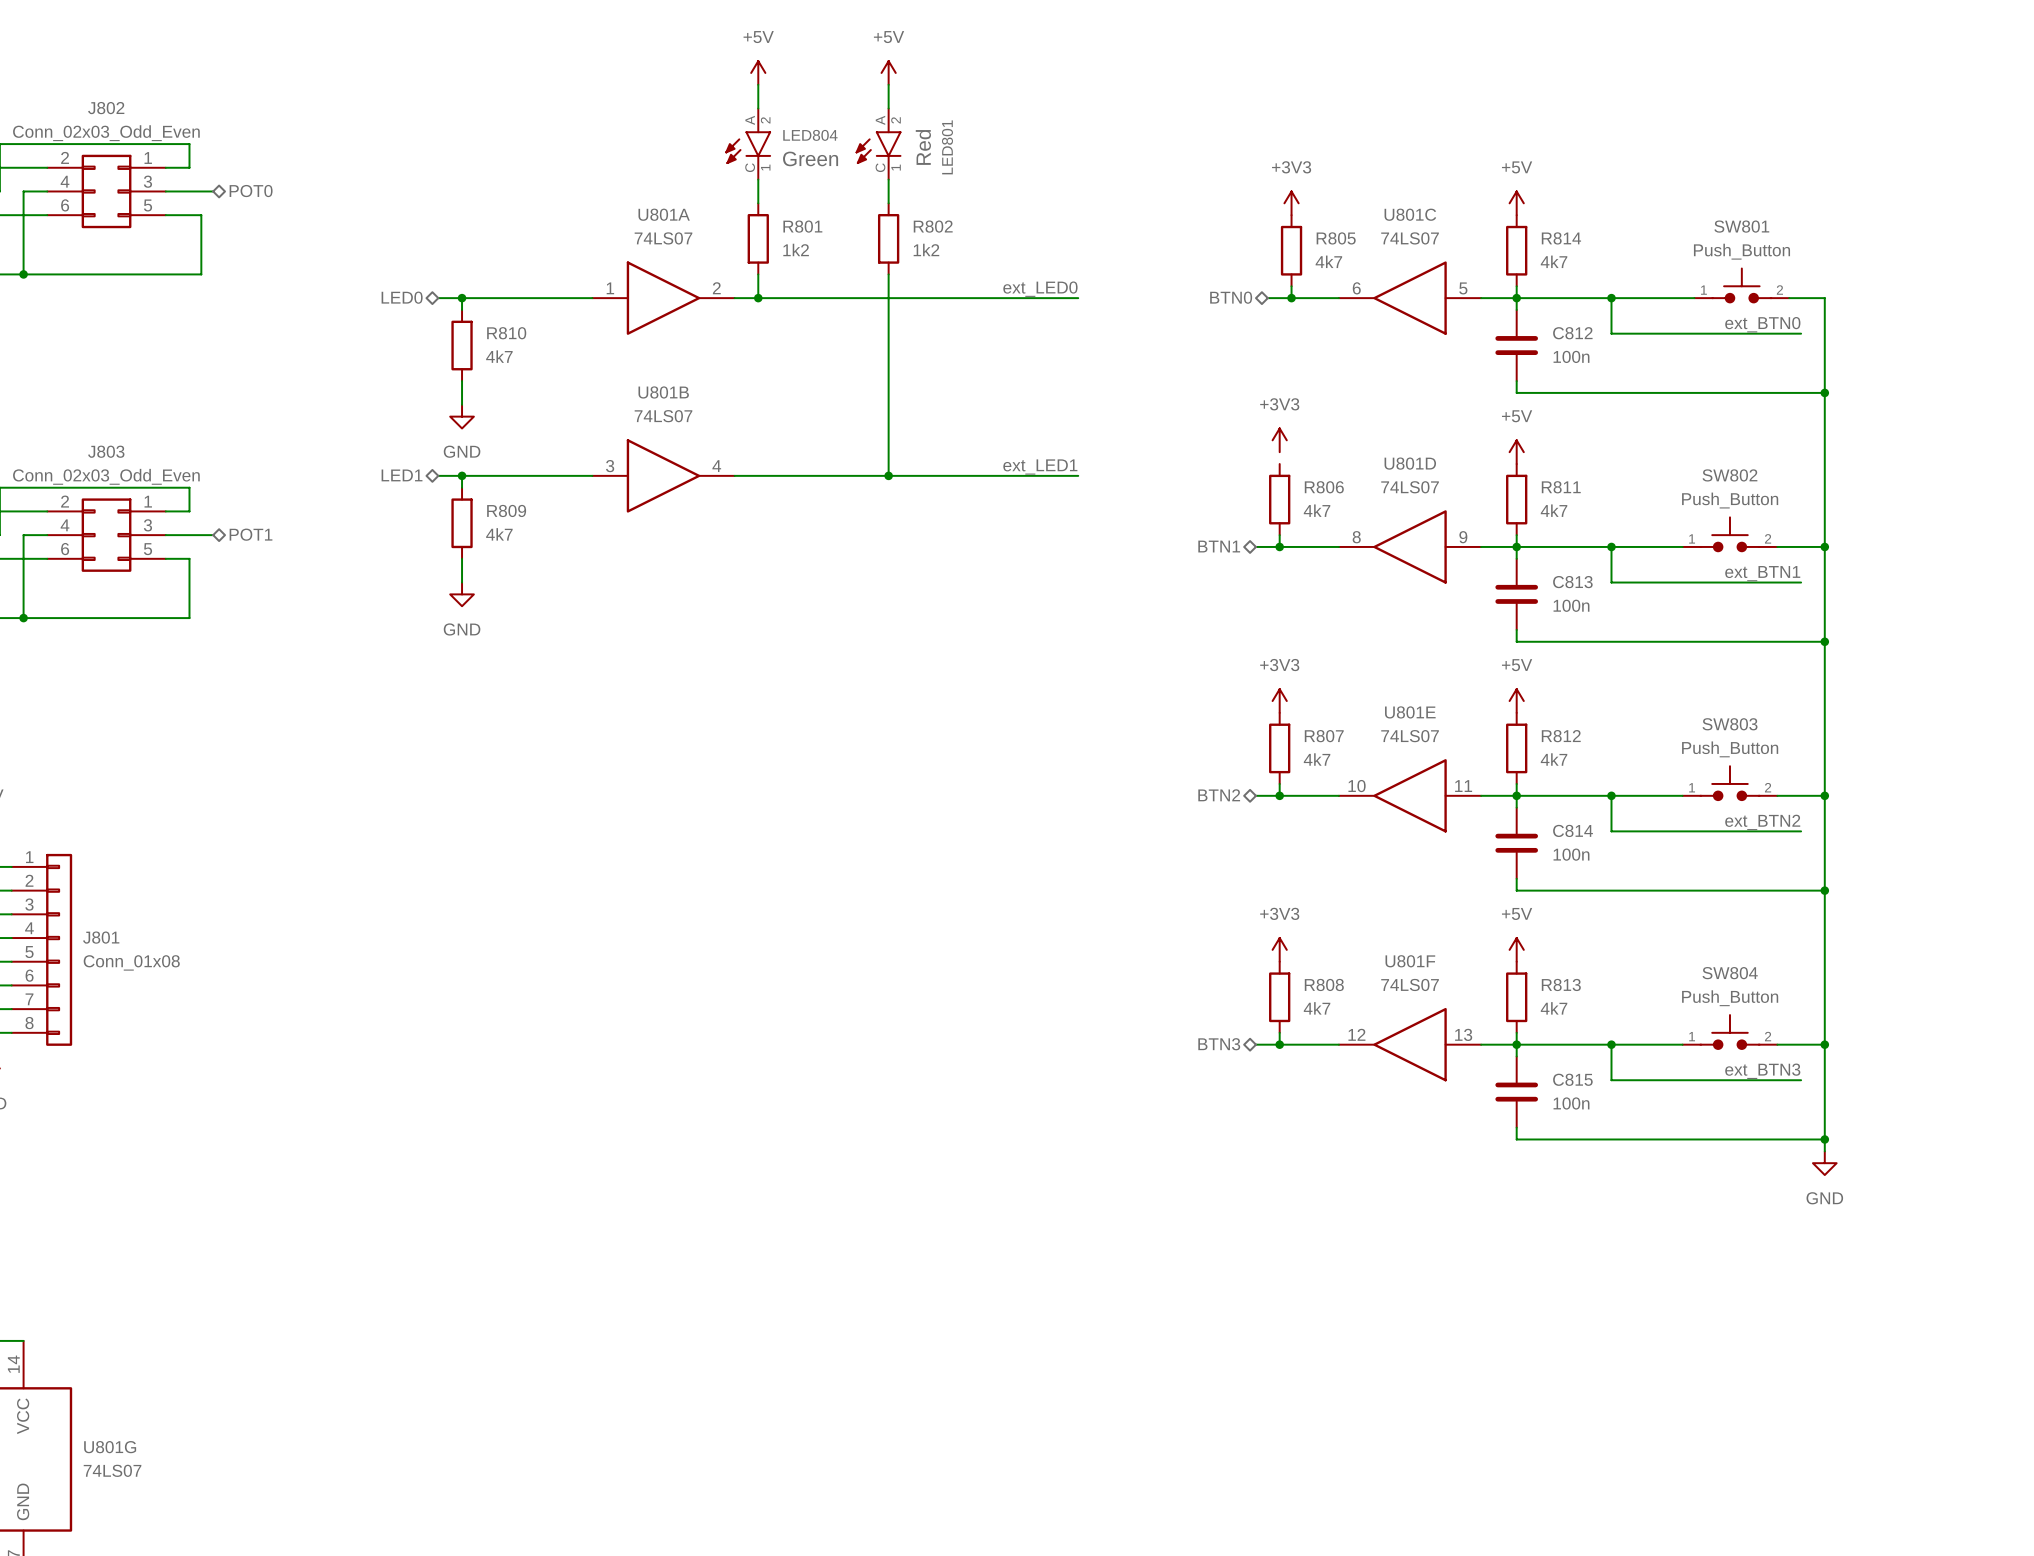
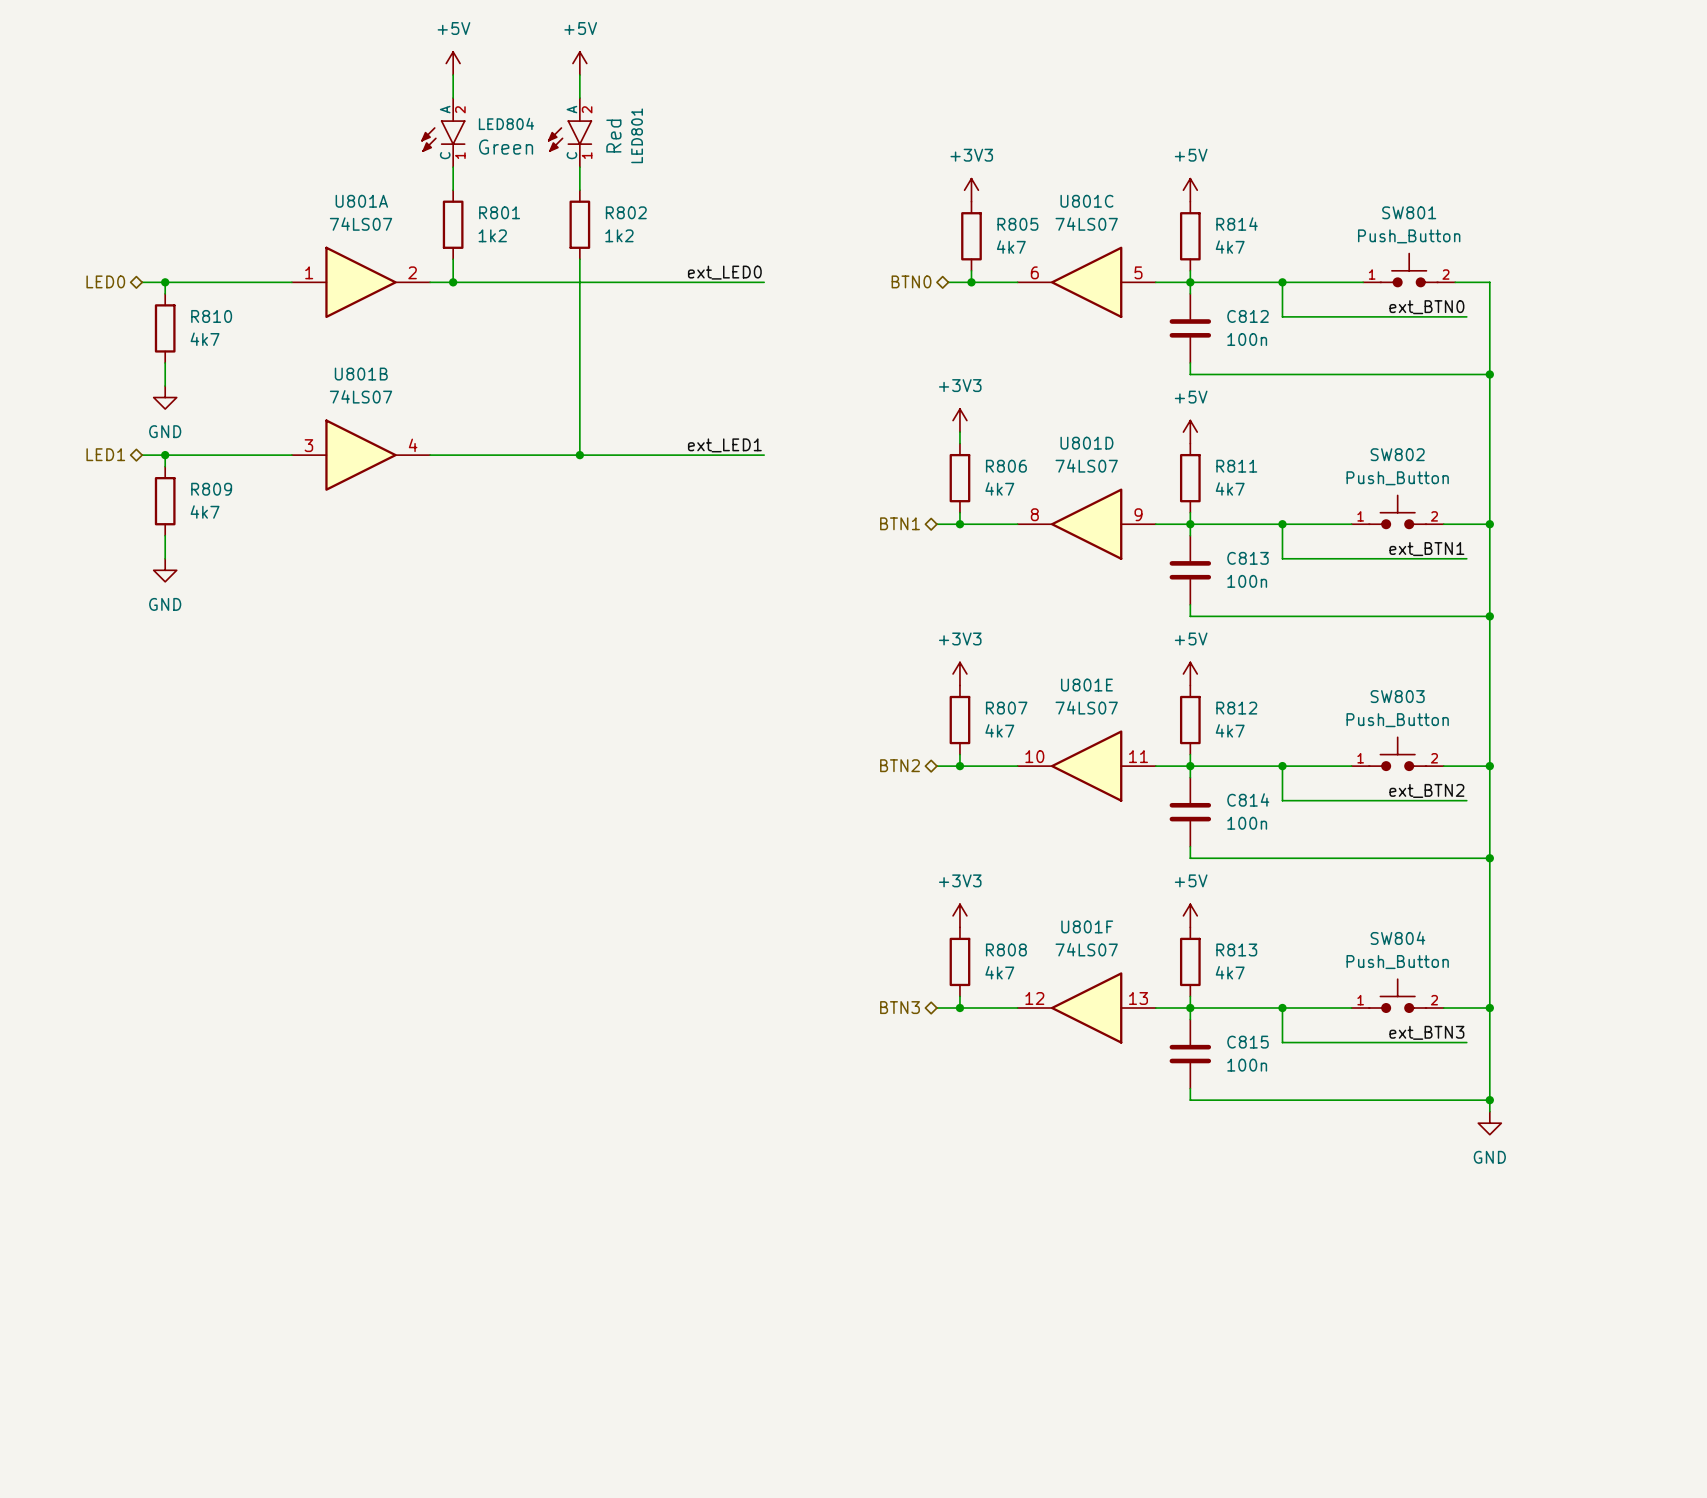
wire: none -> (959, 432) (959, 443)

